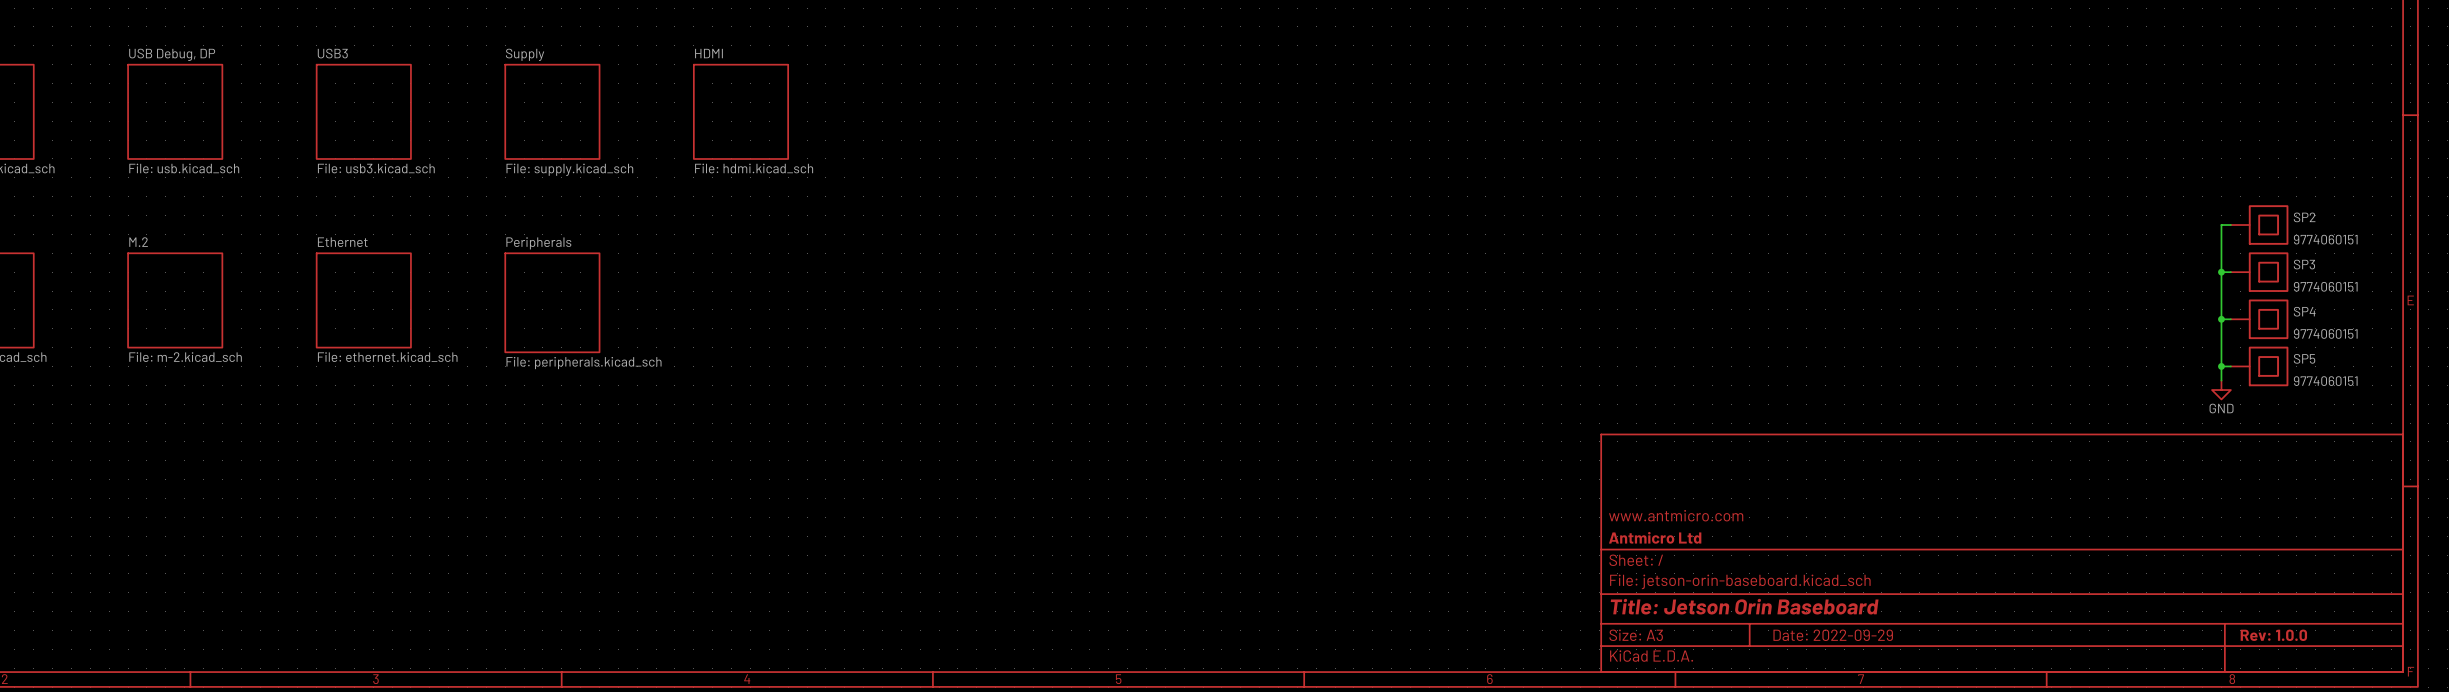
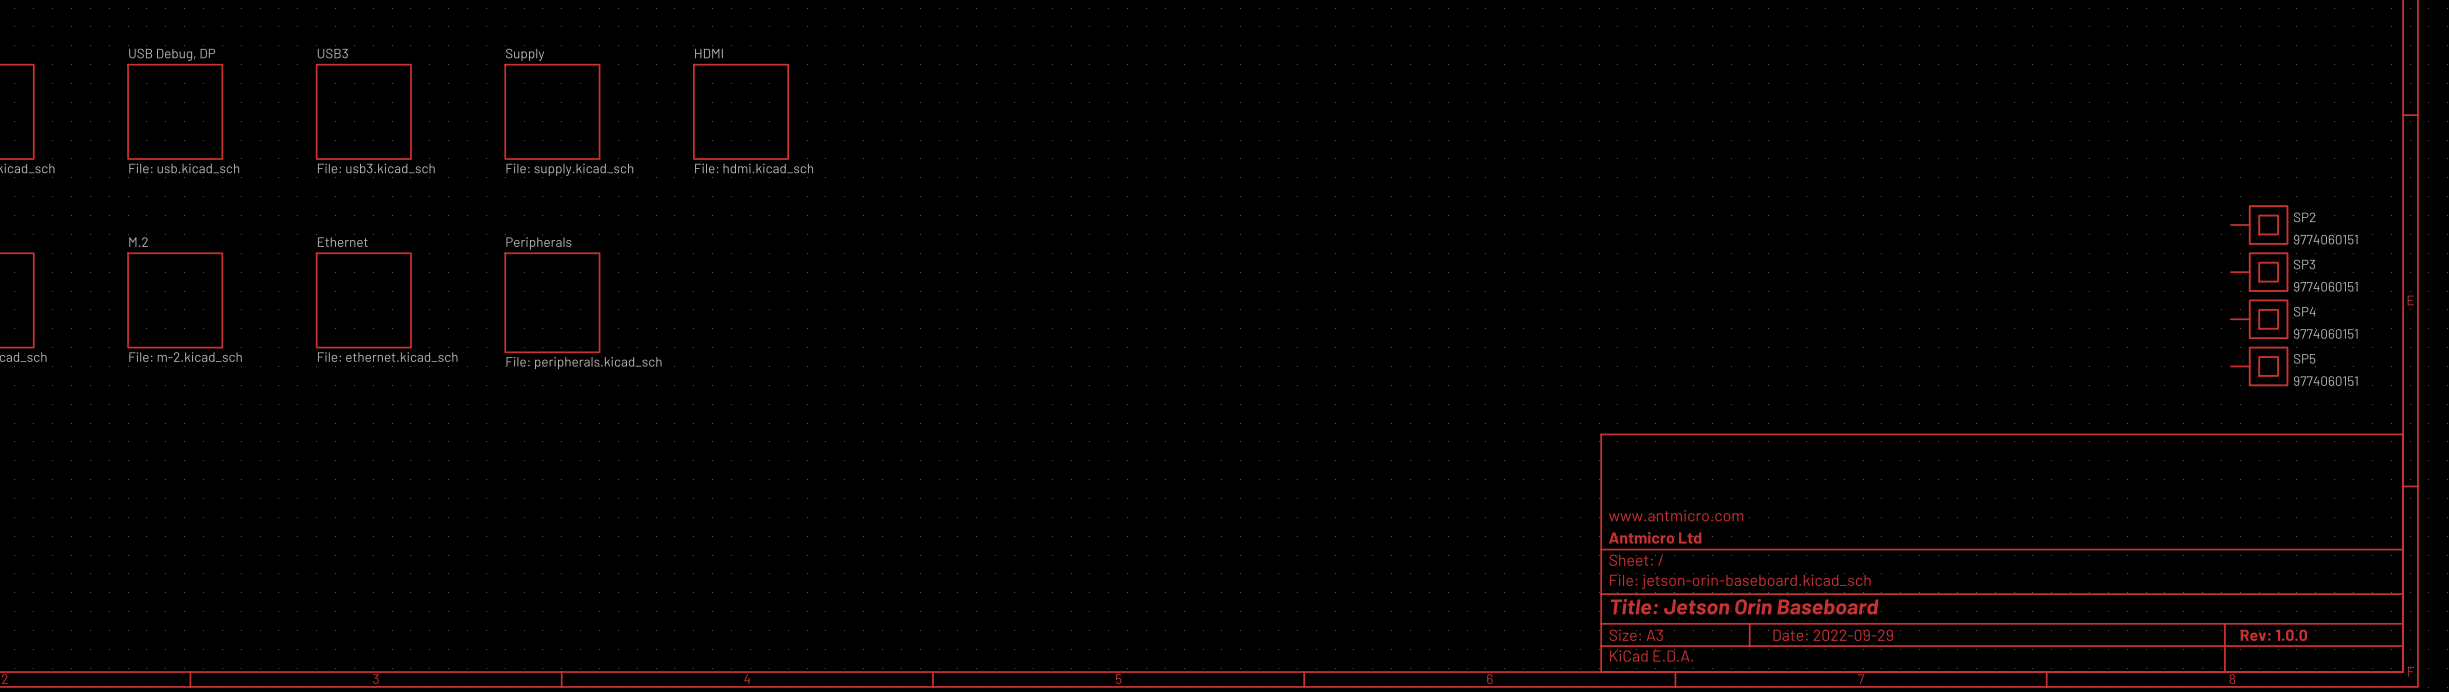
wire: (2230, 225) (2221, 225) (2221, 380) -> none
wire: (2221, 272) (2230, 272) -> none
junction: (2221, 272) -> none
wire: (2221, 319) (2230, 319) -> none
junction: (2221, 319) -> none
wire: (2221, 366) (2230, 366) -> none
junction: (2221, 366) -> none
power symbol: GND (2221, 390) -> none

